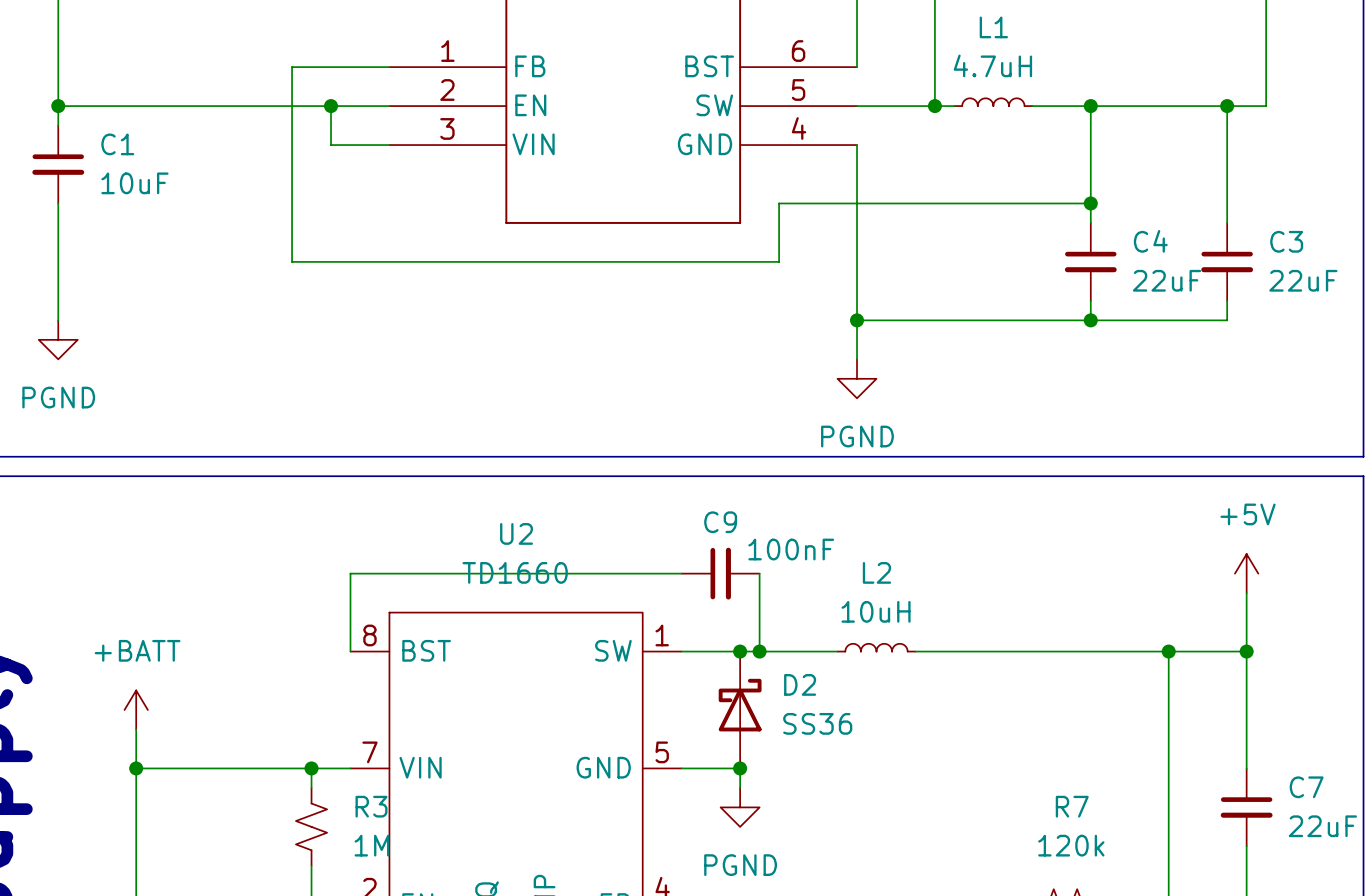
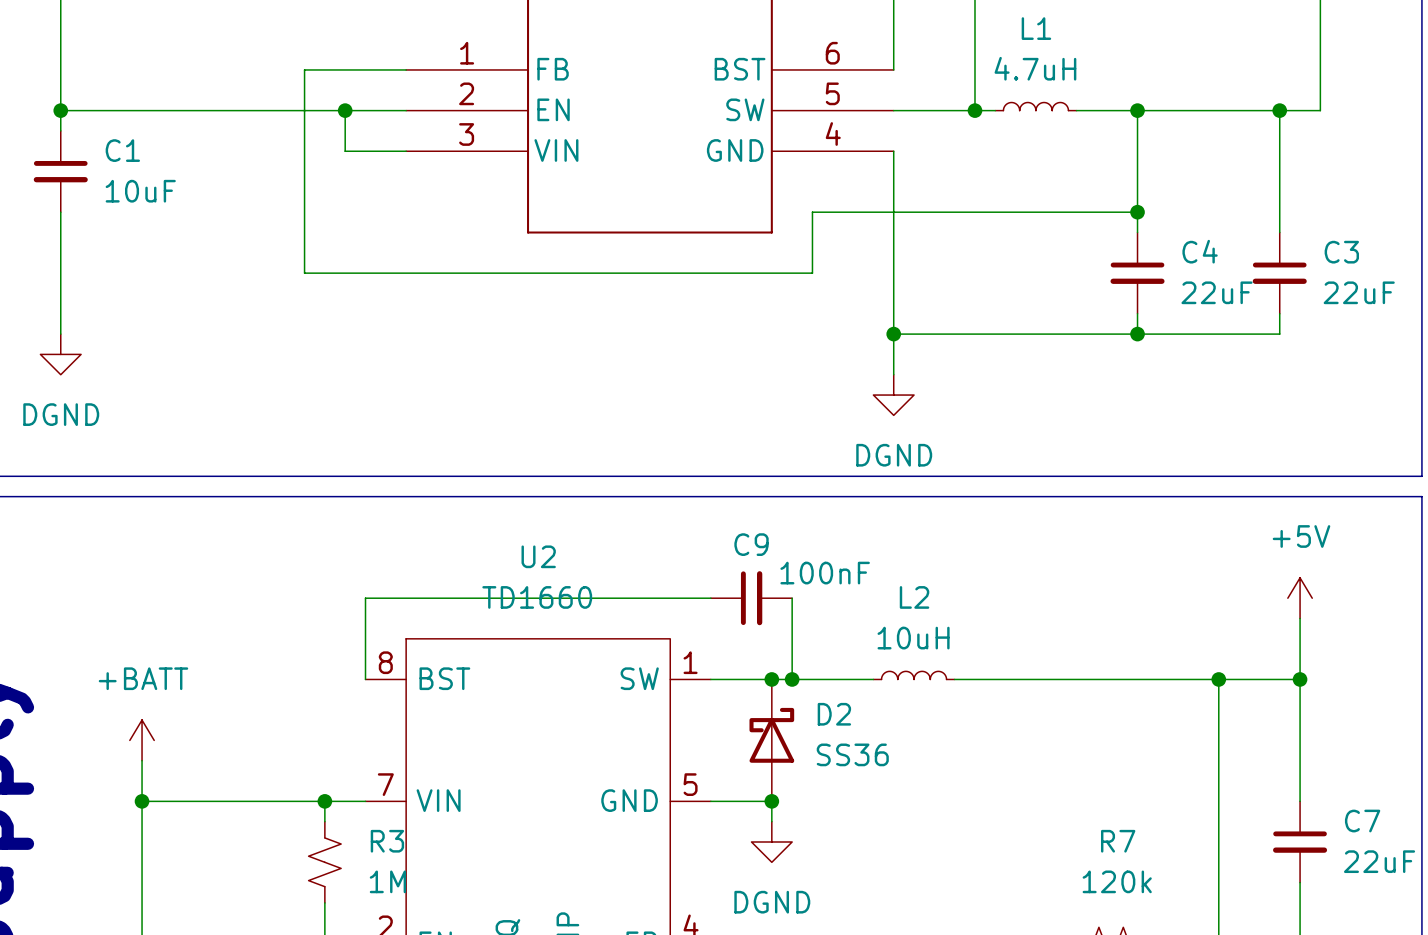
power symbol: PGND (58, 339) -> DGND (60, 354)
power symbol: PGND (857, 378) -> DGND (893, 395)
power symbol: PGND (740, 807) -> DGND (771, 842)

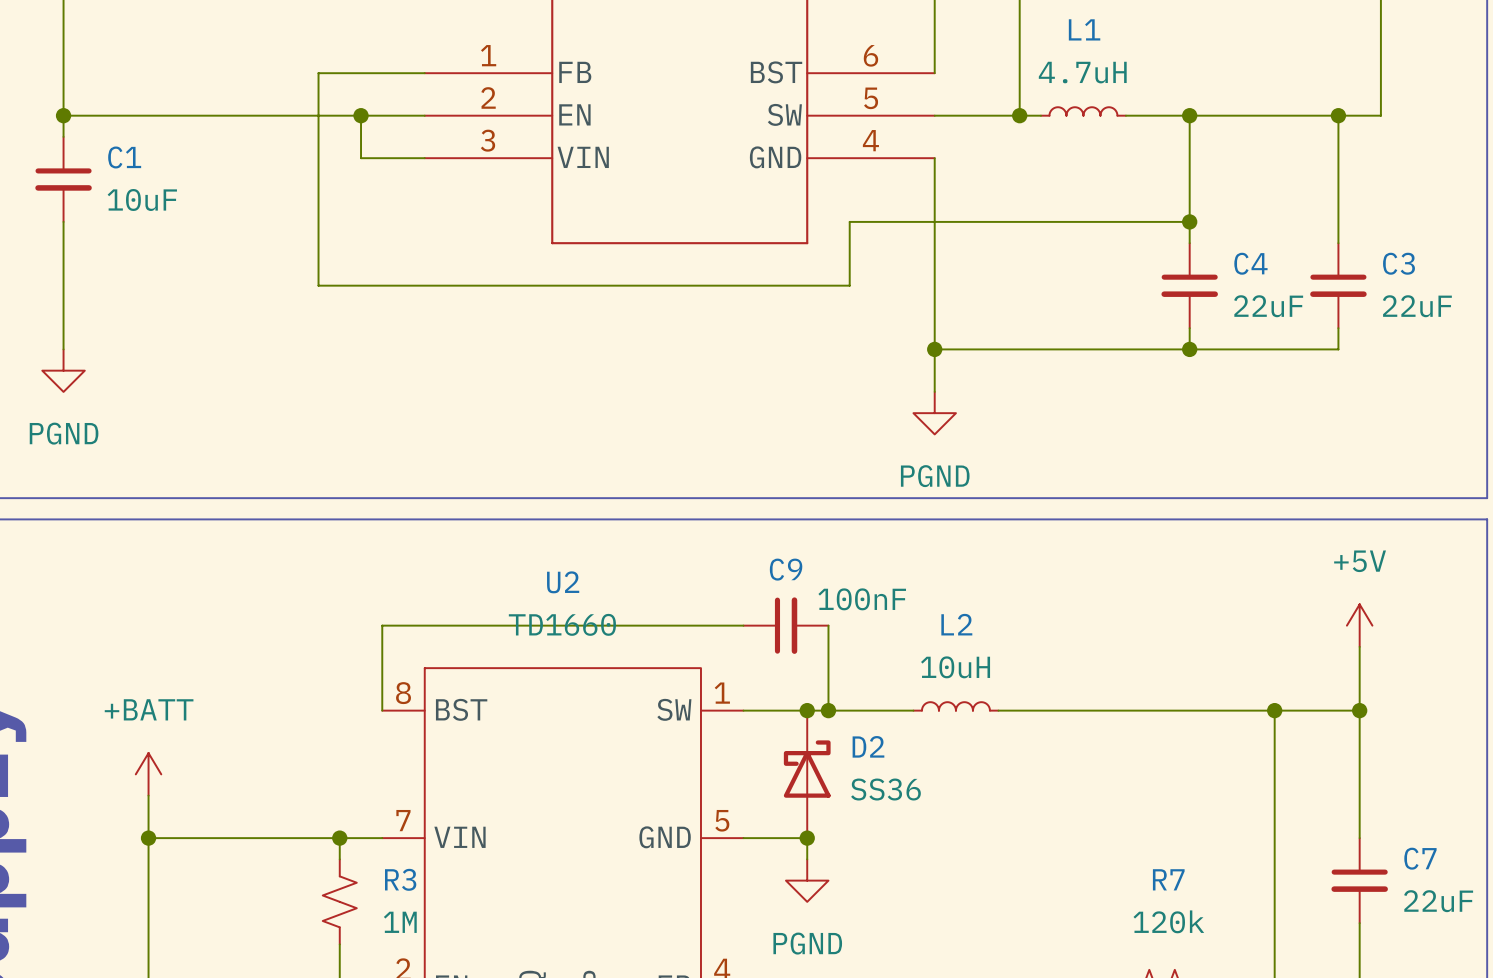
power symbol: DGND (60, 354) -> PGND (63, 370)
power symbol: DGND (893, 395) -> PGND (934, 413)
power symbol: DGND (771, 842) -> PGND (807, 880)

